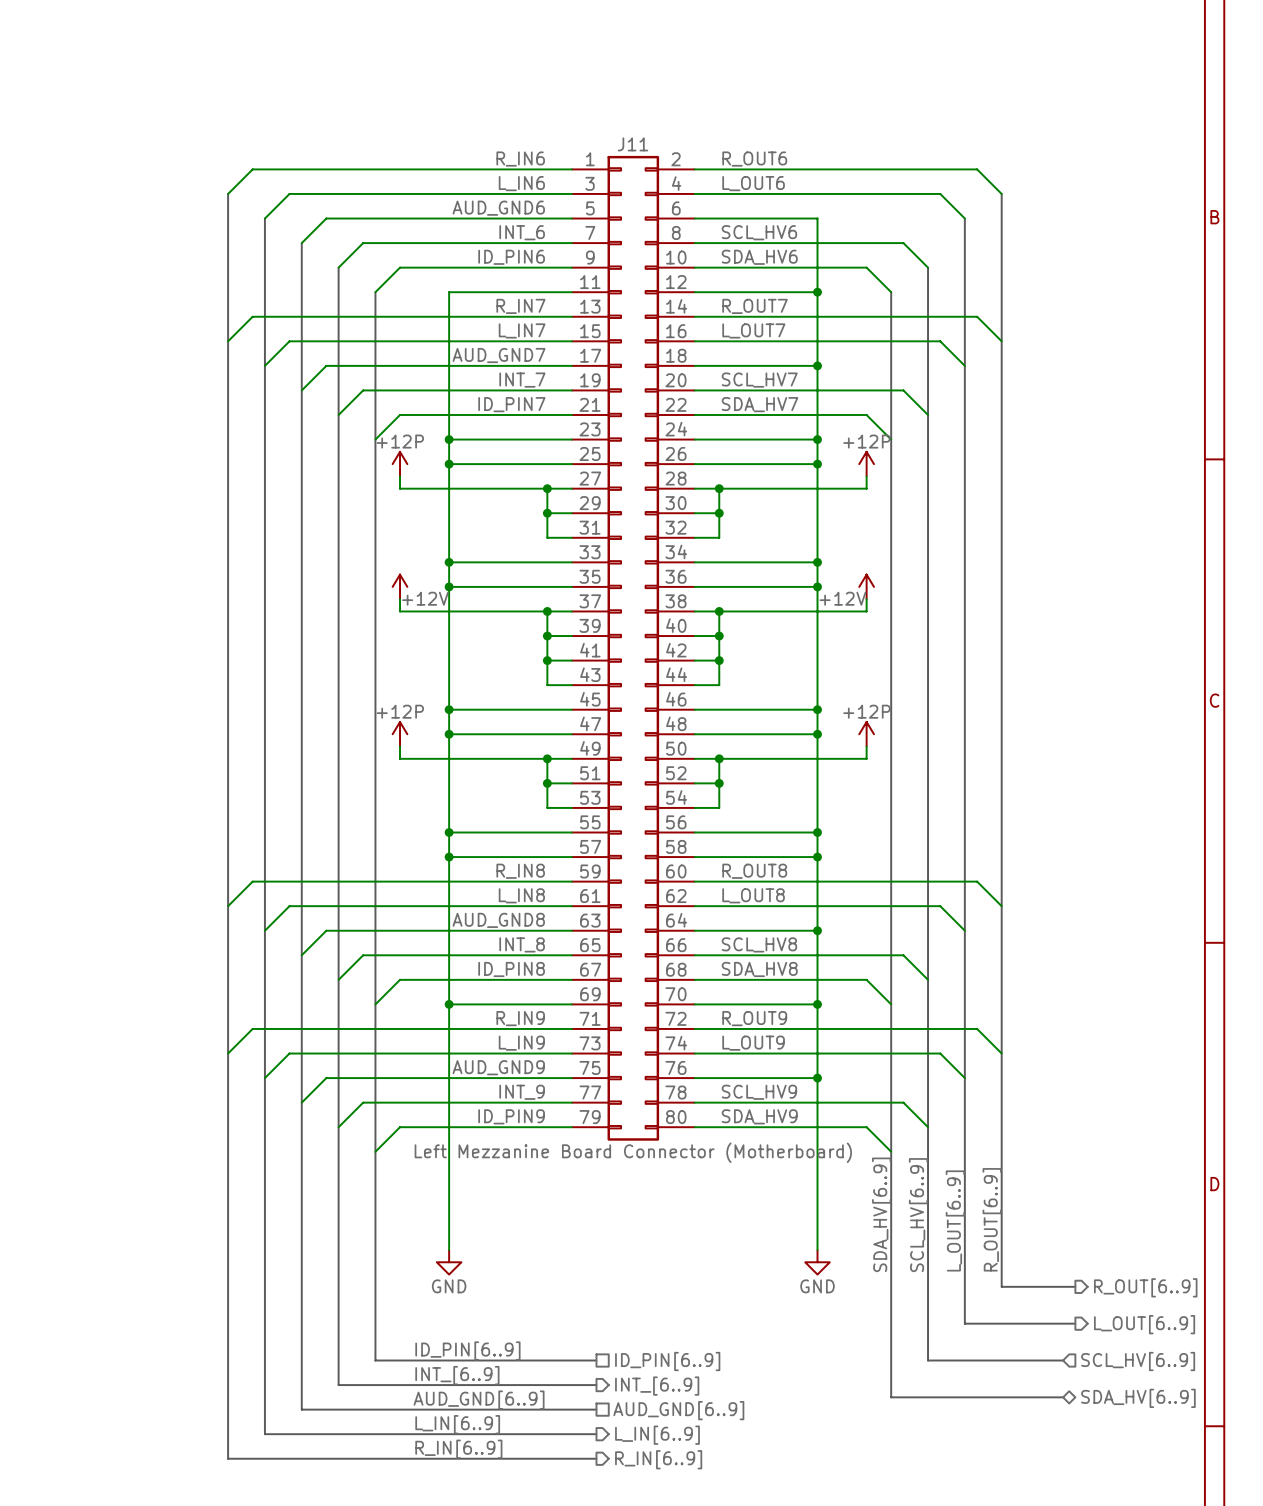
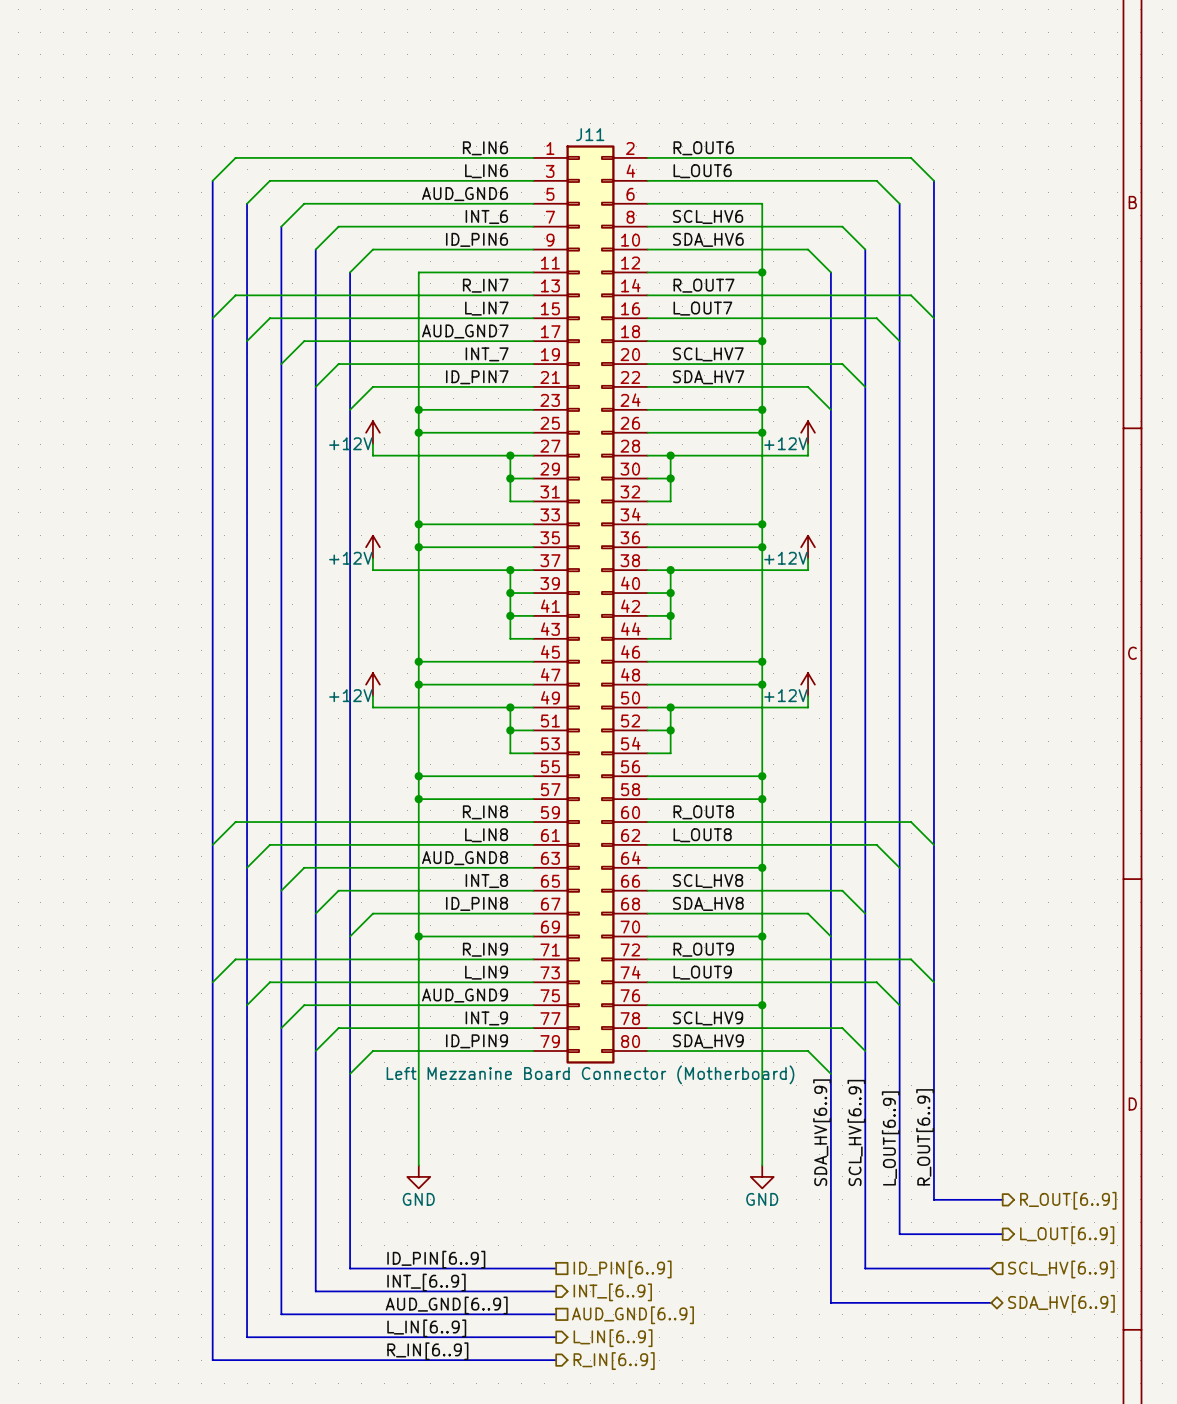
power symbol: +12P (400, 464) -> +12V (372, 432)
power symbol: +12P (866, 464) -> +12V (808, 432)
power symbol text position: +12V (425, 598) -> +12V (350, 558)
power symbol: +12P (400, 734) -> +12V (372, 684)
power symbol: +12P (866, 734) -> +12V (808, 684)

